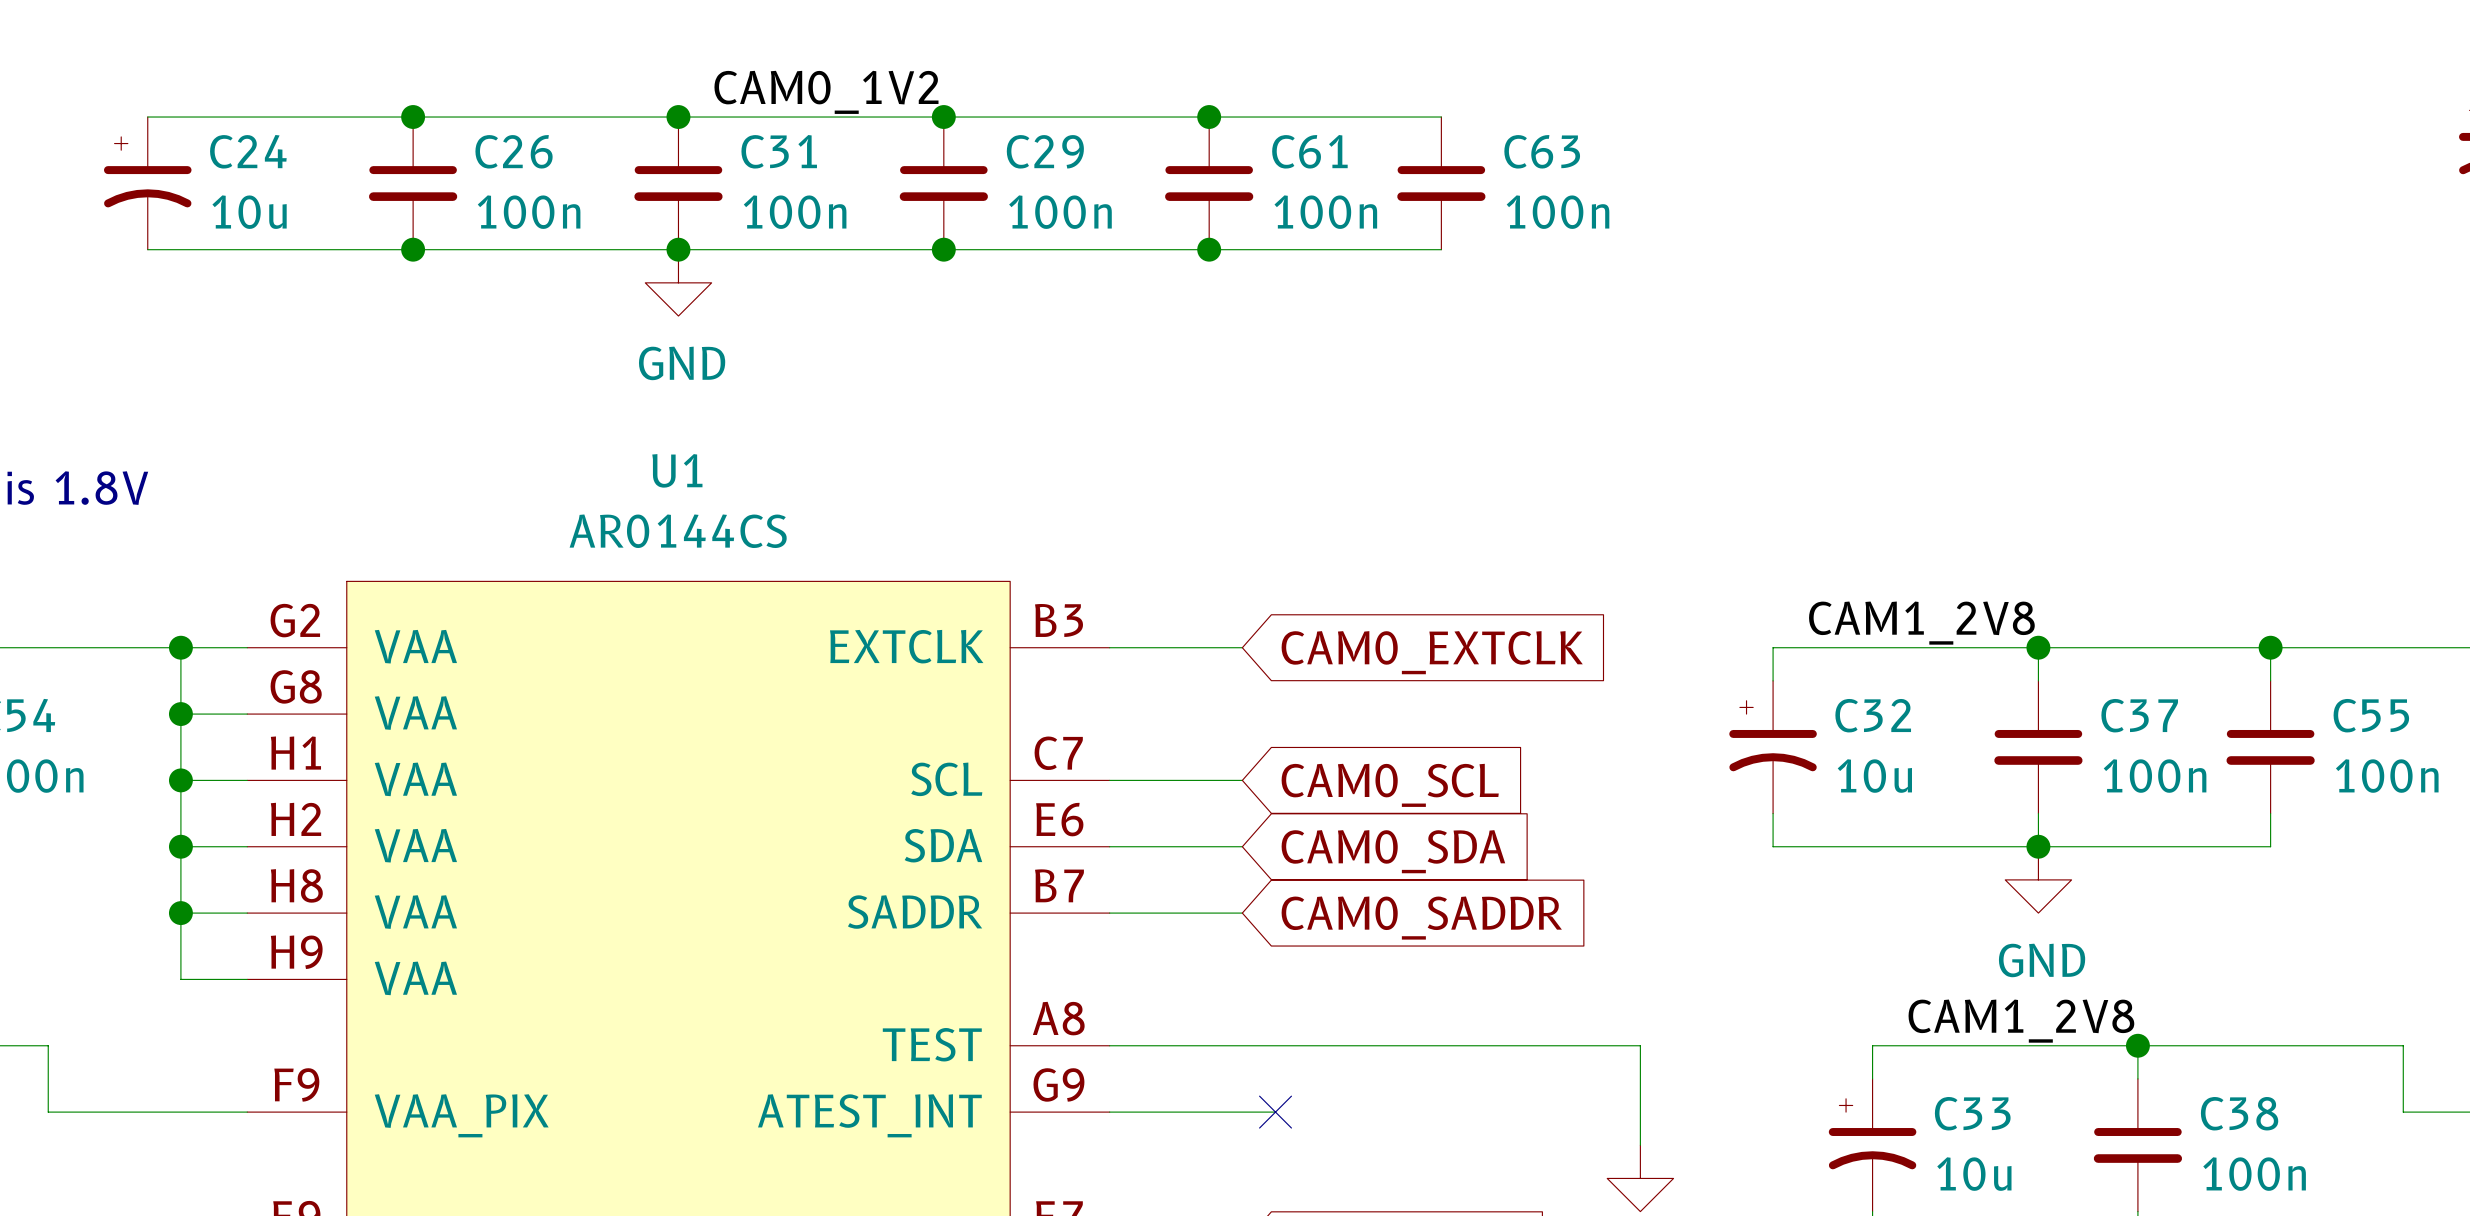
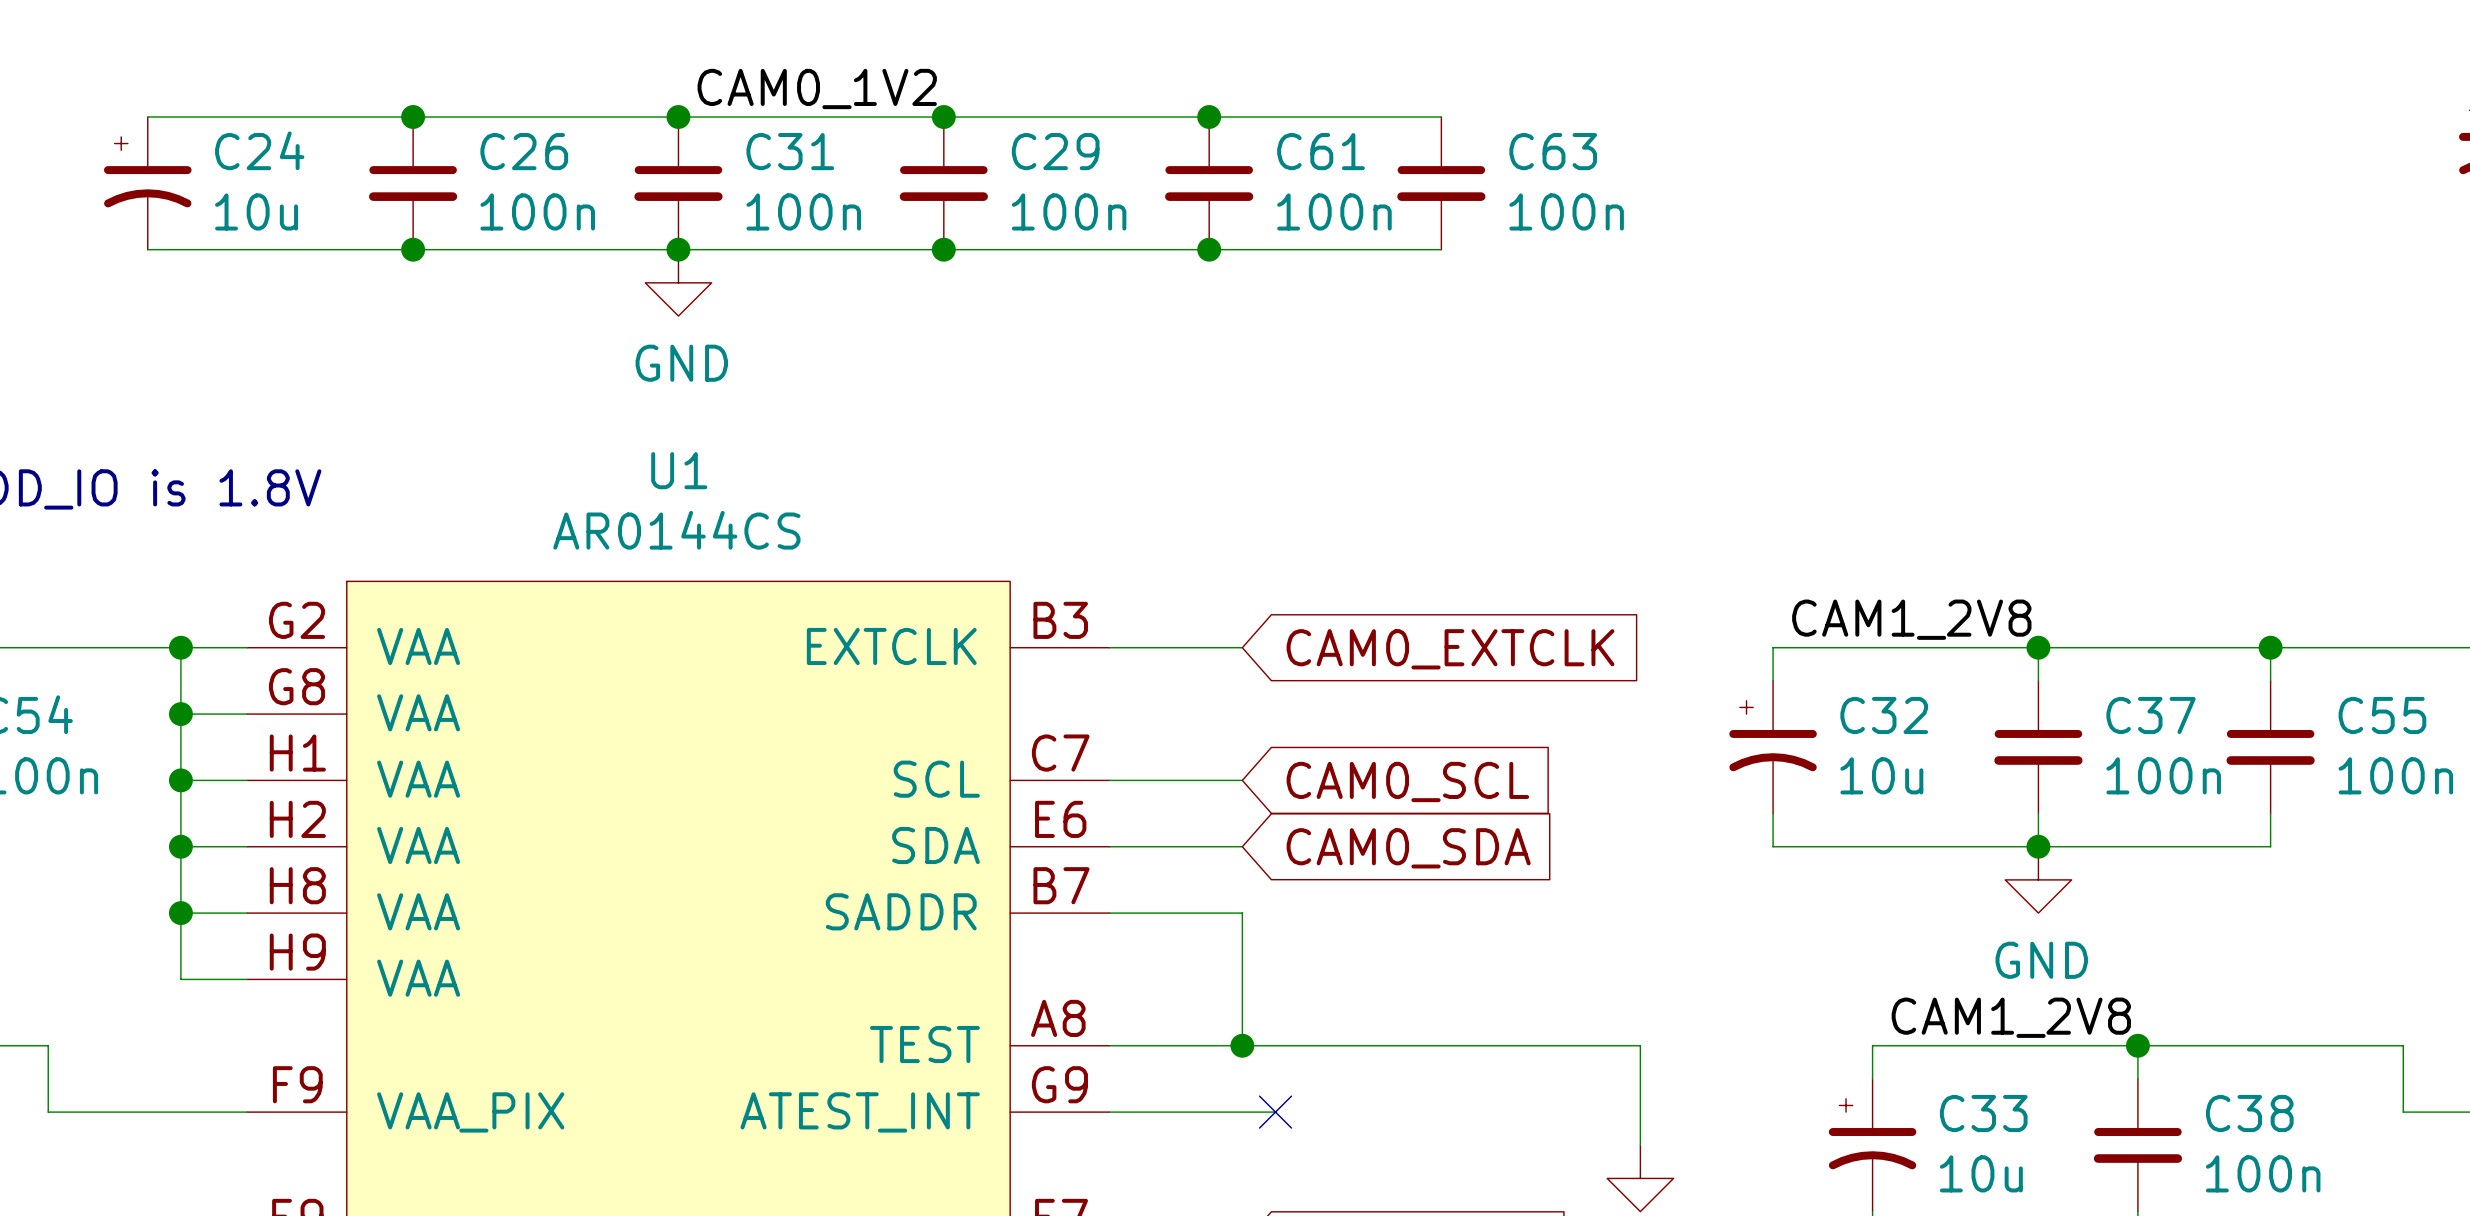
wire: none -> (1242, 913) (1242, 1045)
global label: CAM0_SADDR (1421, 918) -> none
junction: none -> (1242, 1045)

